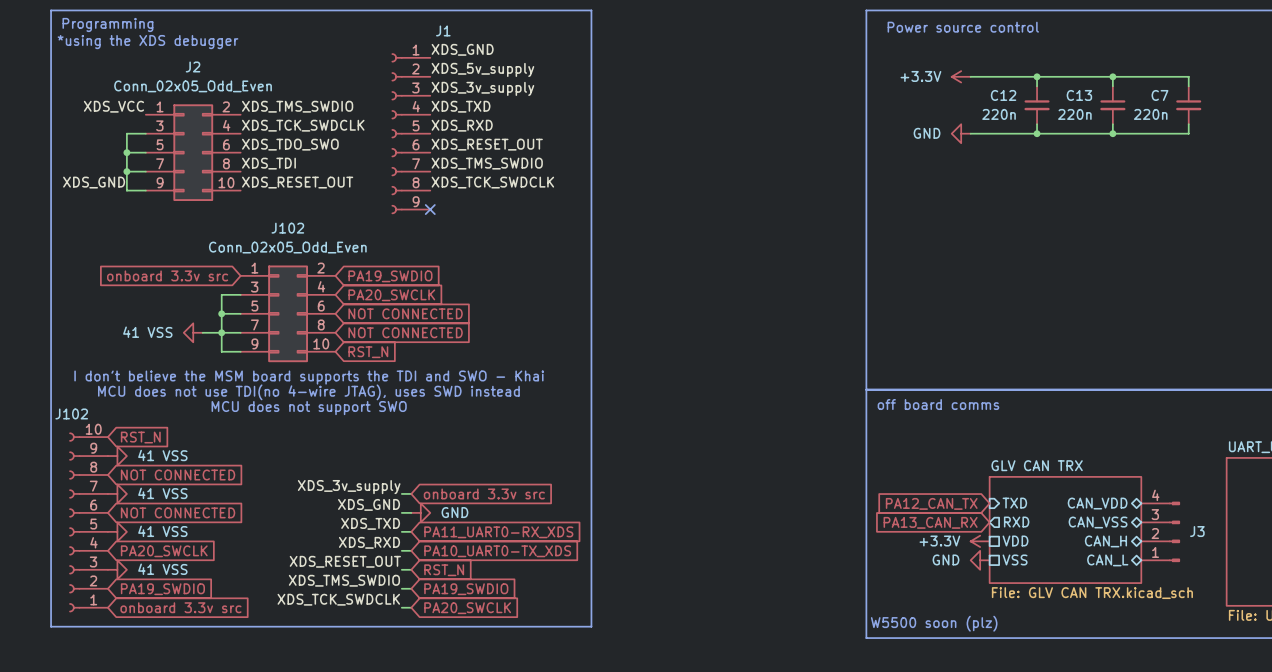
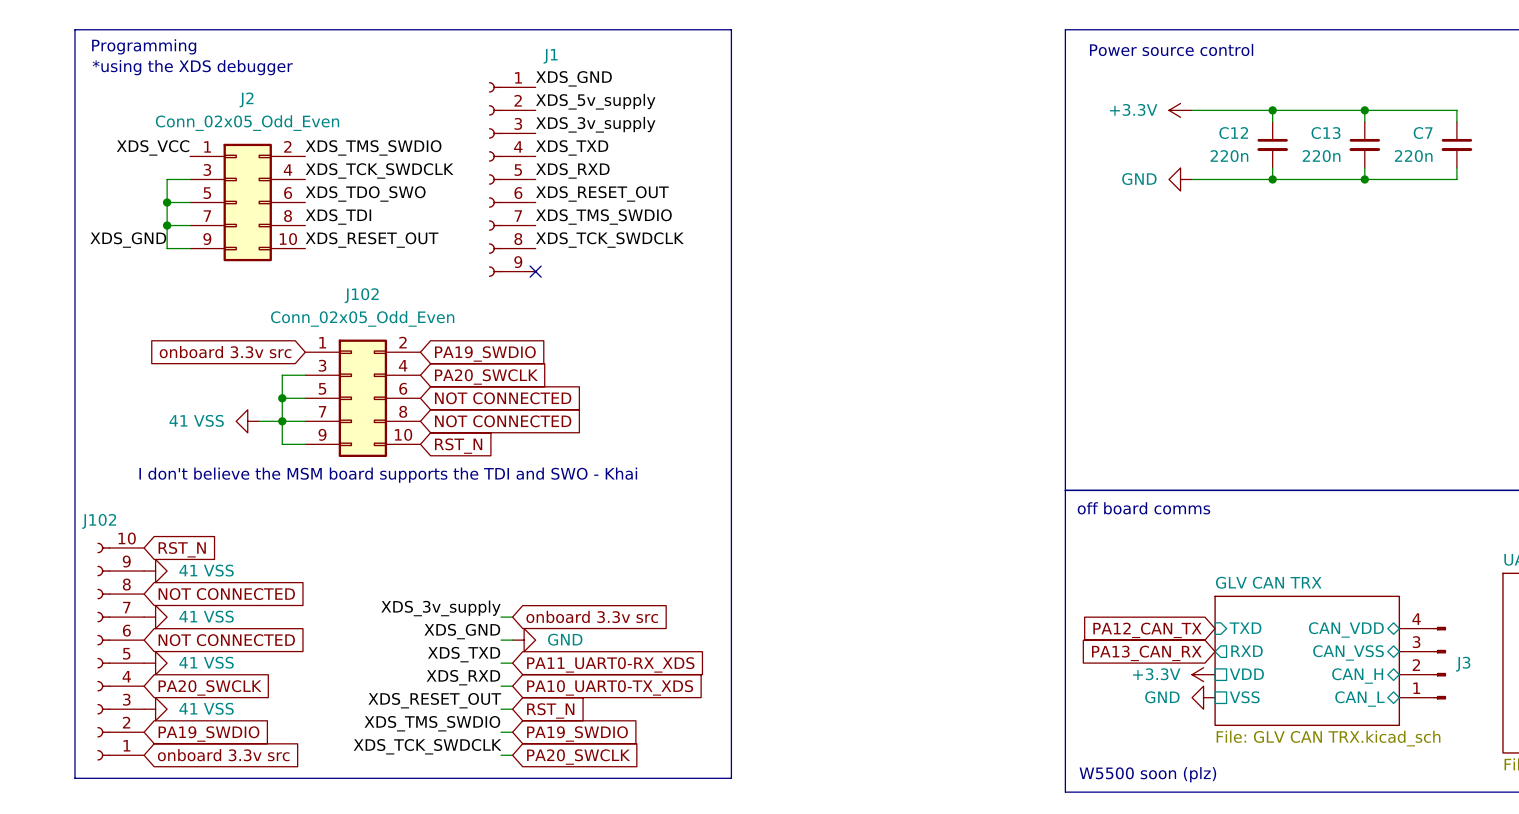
text: MCU does not use TDI(no 4-wire JTAG), uses SWD instead (308, 392) -> none
text: MCU does not support SWO (309, 408) -> none

